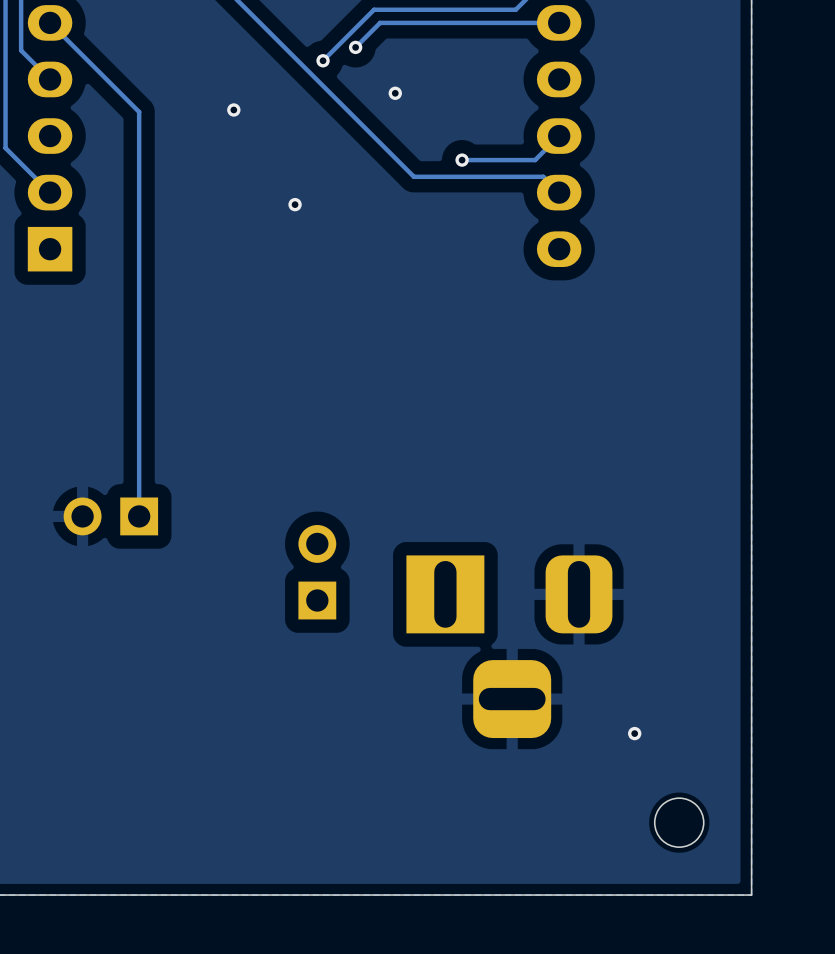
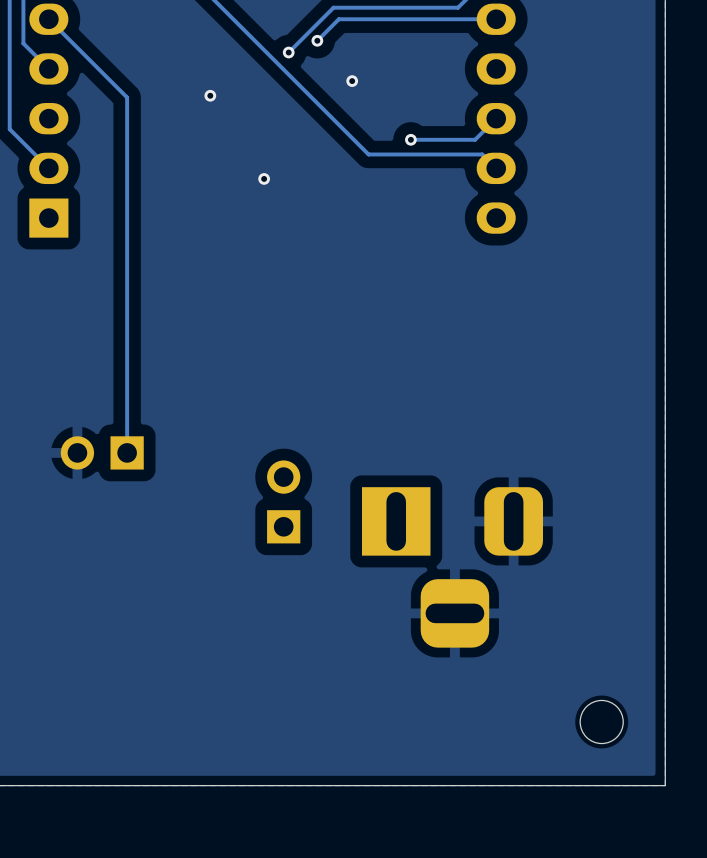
via: (634, 733) -> none

